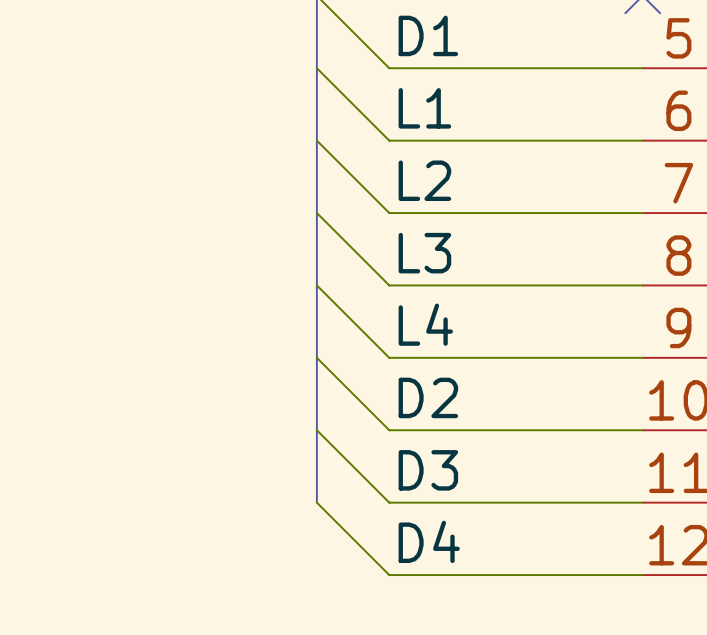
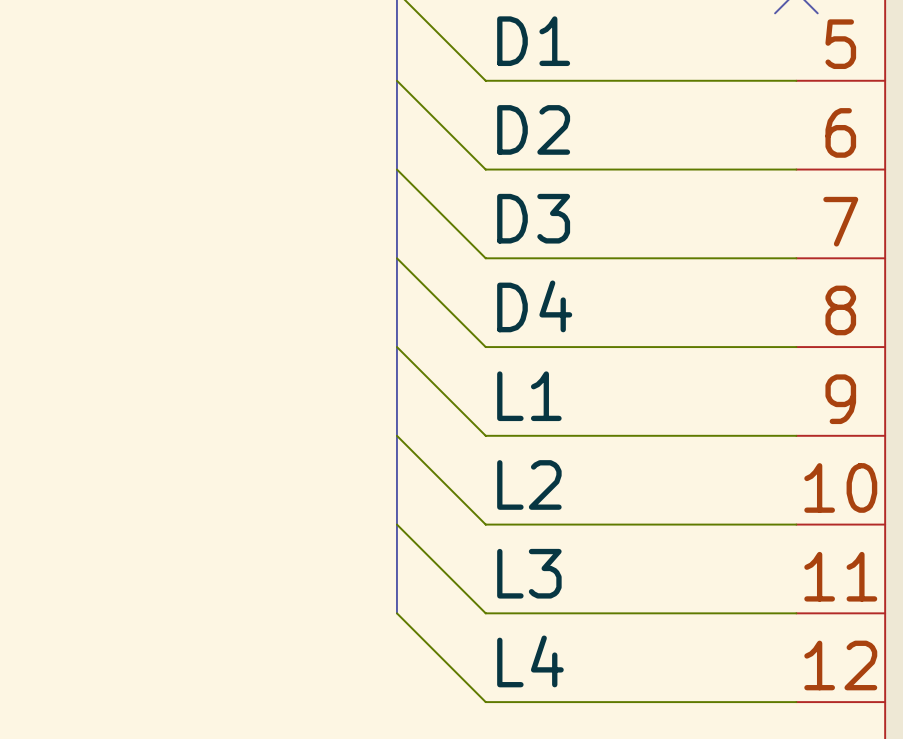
label: L1 (424, 108) -> D2 (533, 129)
label: L2 (424, 180) -> D3 (533, 218)
label: L3 (424, 253) -> D4 (534, 306)
label: L4 (425, 324) -> L1 (529, 396)
label: D2 (428, 397) -> L2 (529, 484)
label: D3 (428, 470) -> L3 (529, 573)
label: D4 (429, 541) -> L4 (530, 661)

